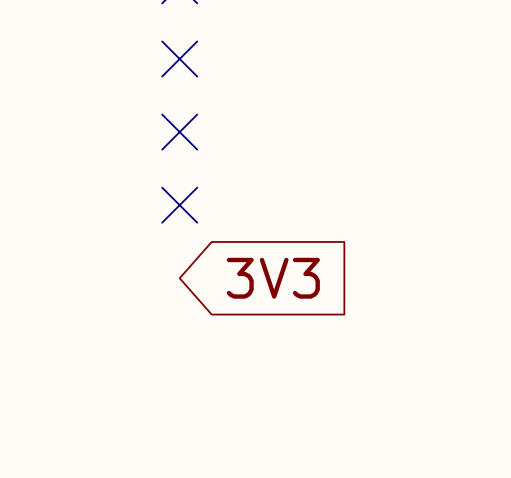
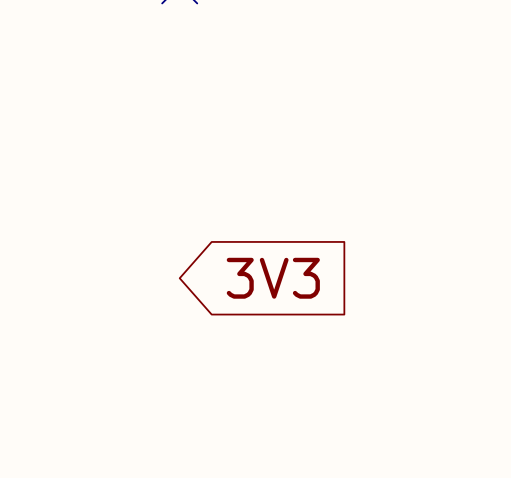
no-connect mark: (179, 58) -> none
no-connect mark: (179, 132) -> none
no-connect mark: (179, 205) -> none

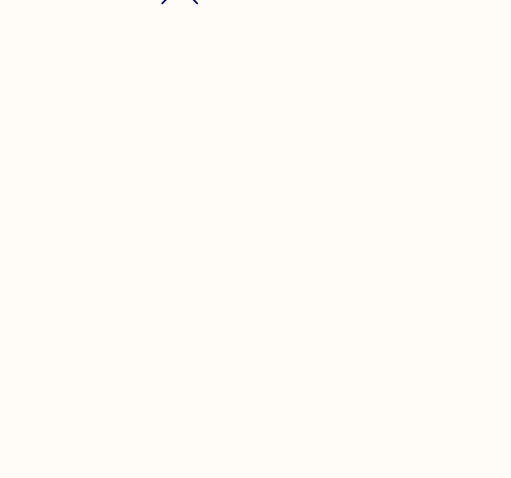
global label: 3V3 (273, 278) -> none

